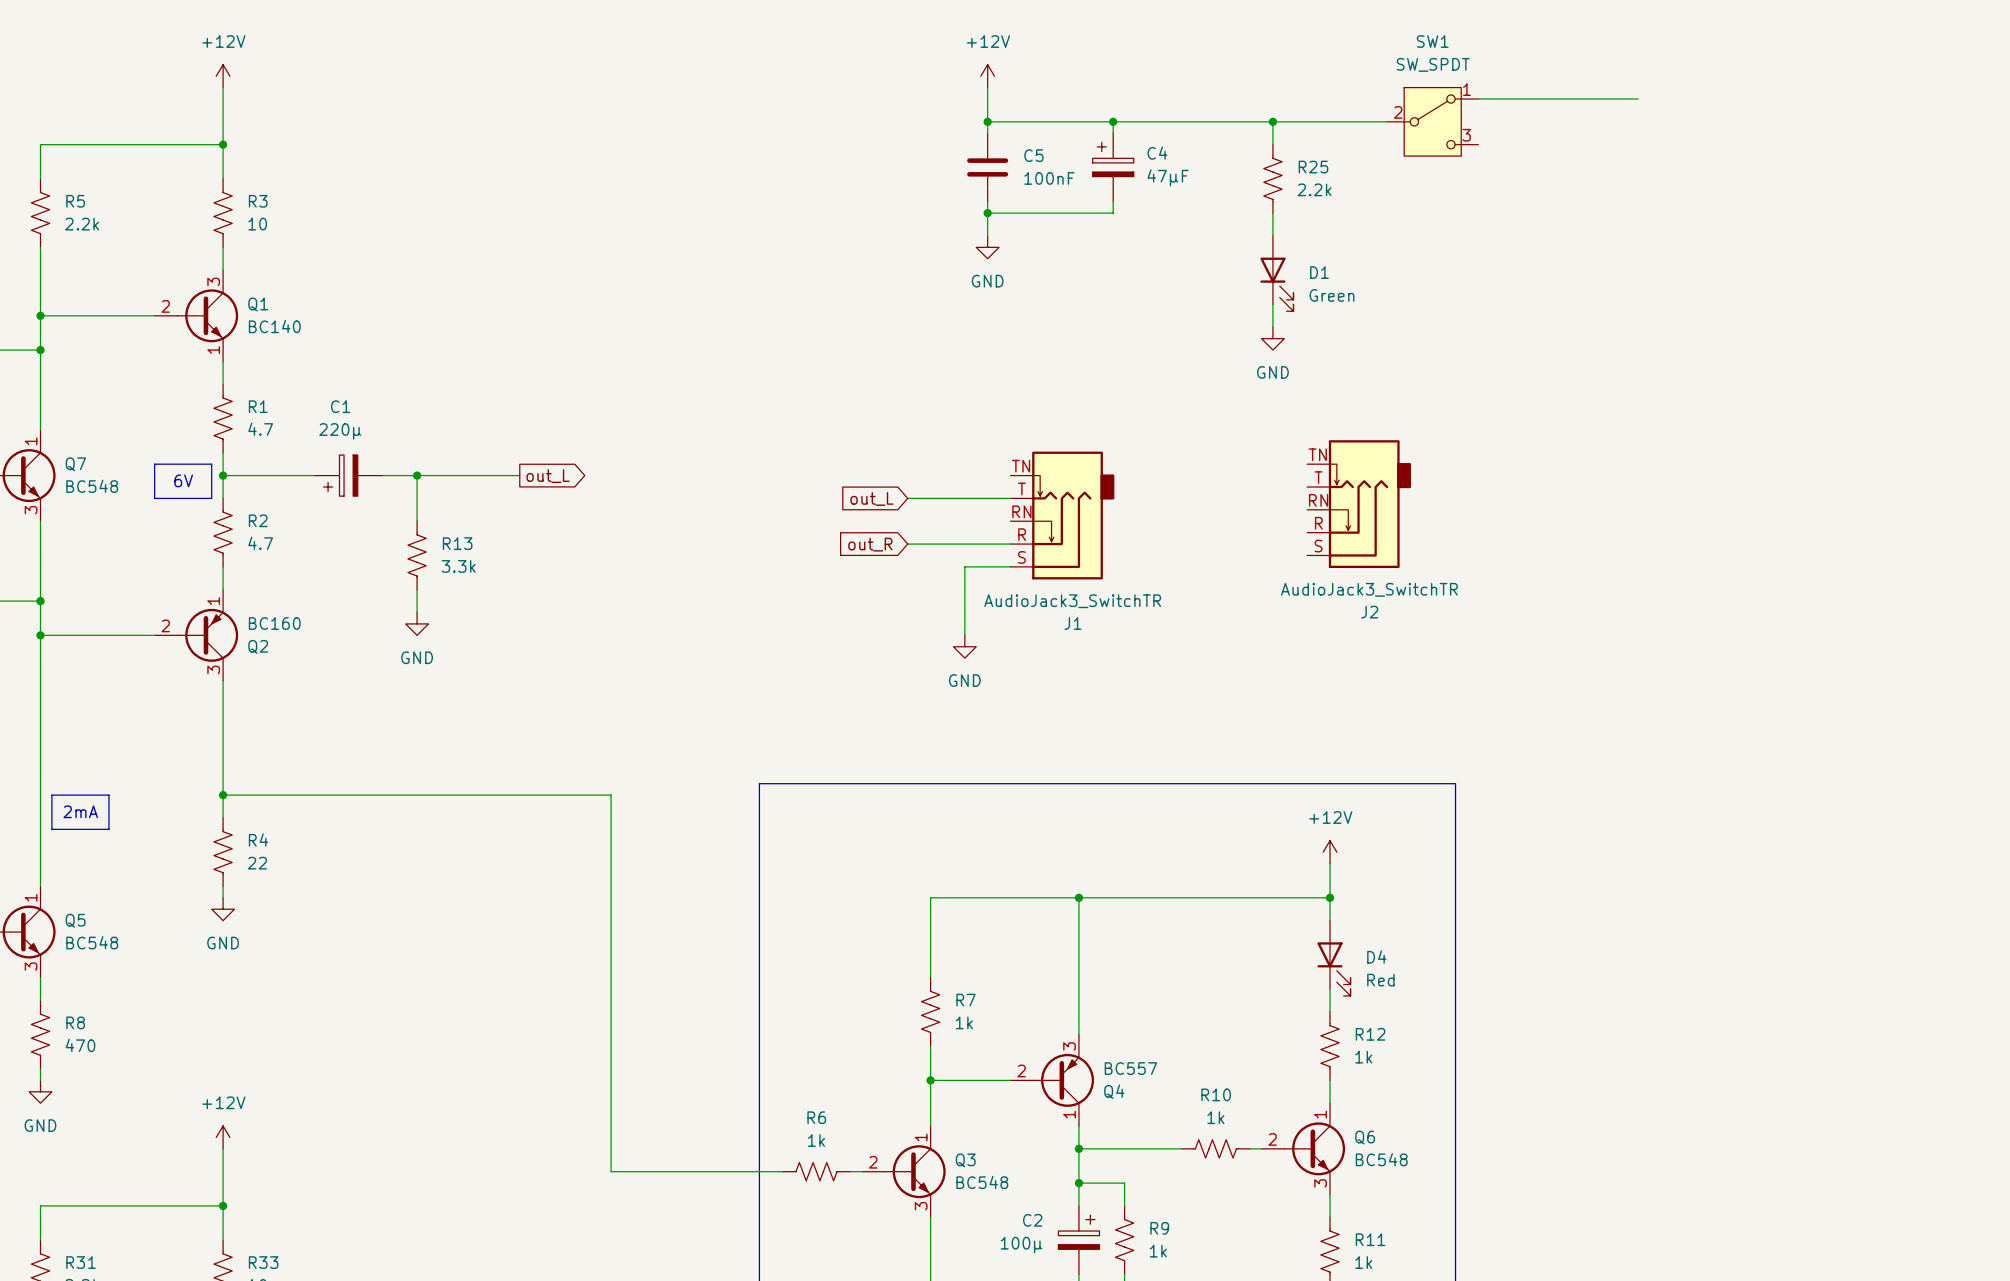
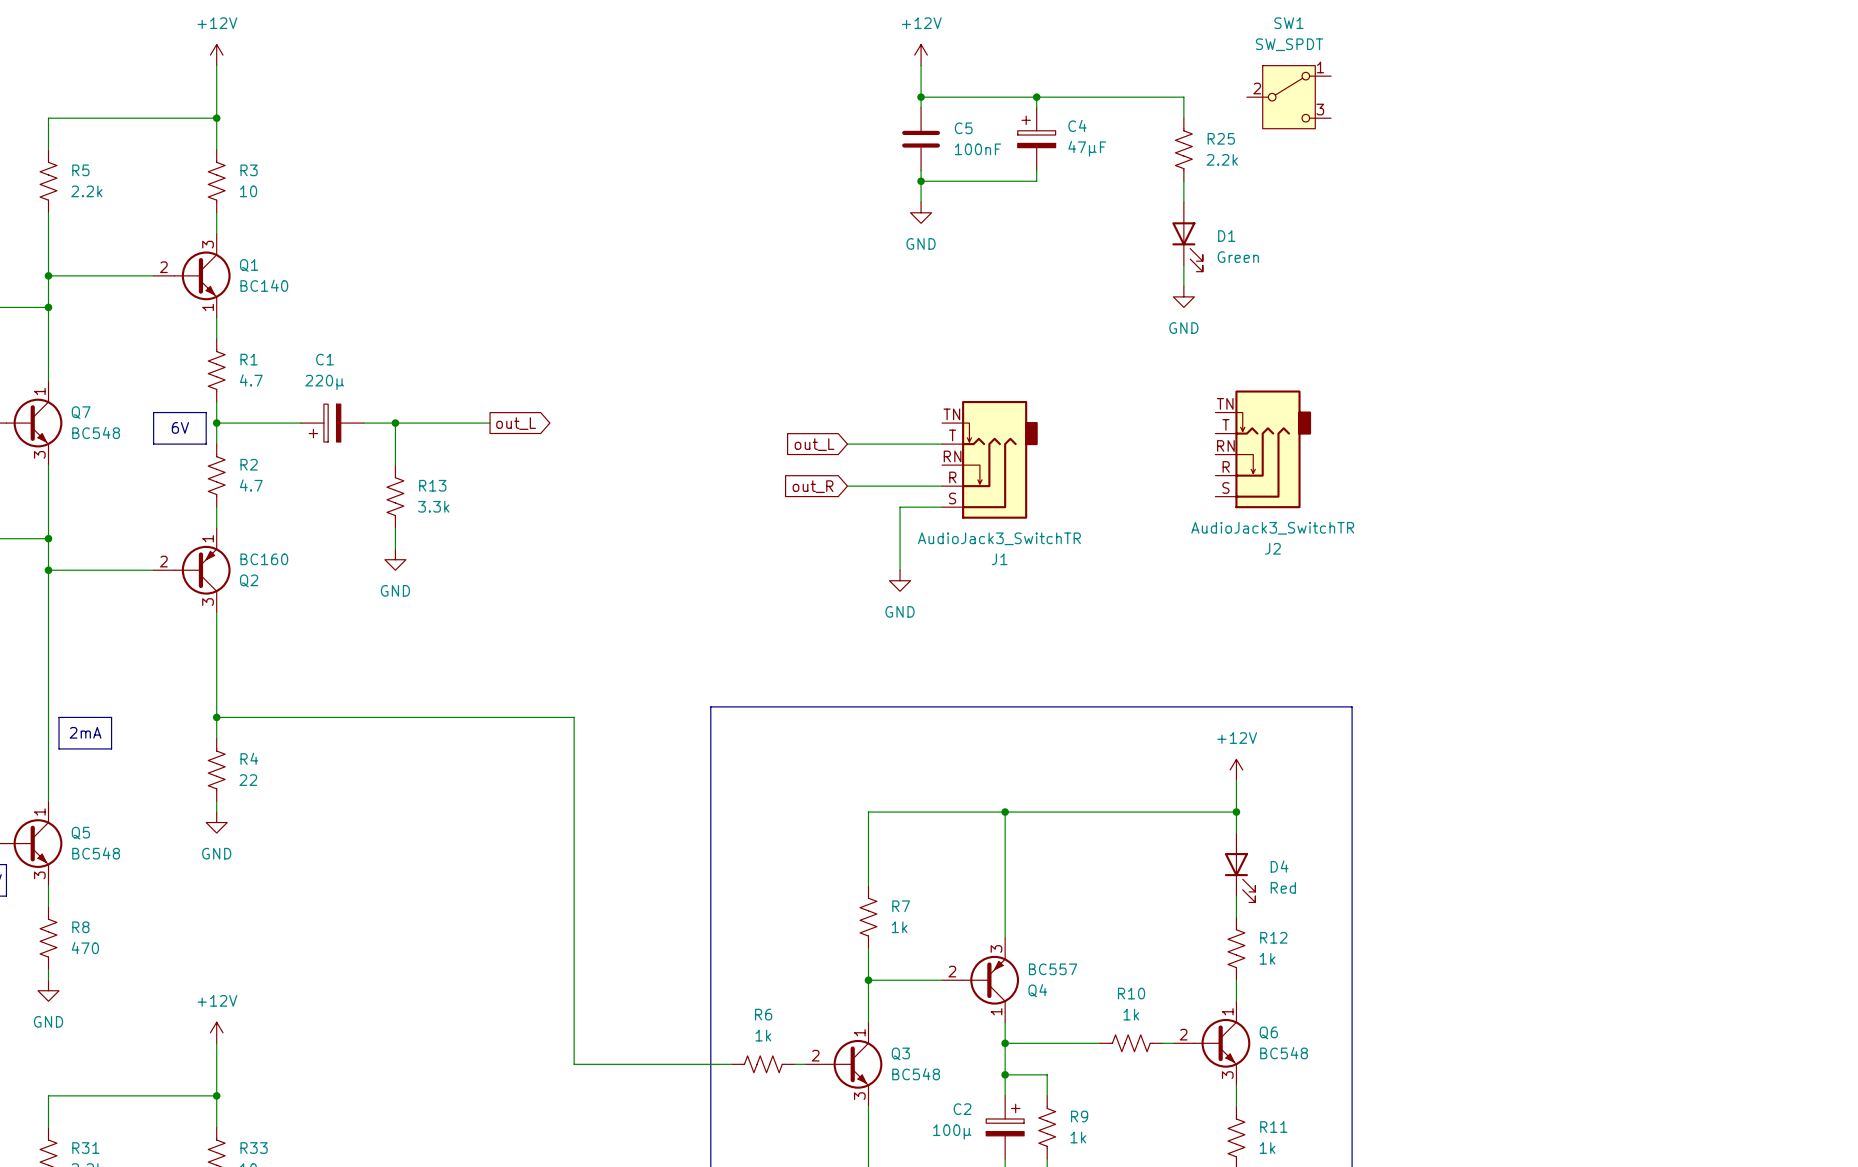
wire: (1478, 99) (1638, 99) -> none
wire: (1272, 121) (1387, 121) -> none
junction: (1272, 121) -> none
SW1 position: (1432, 121) -> (1289, 97)

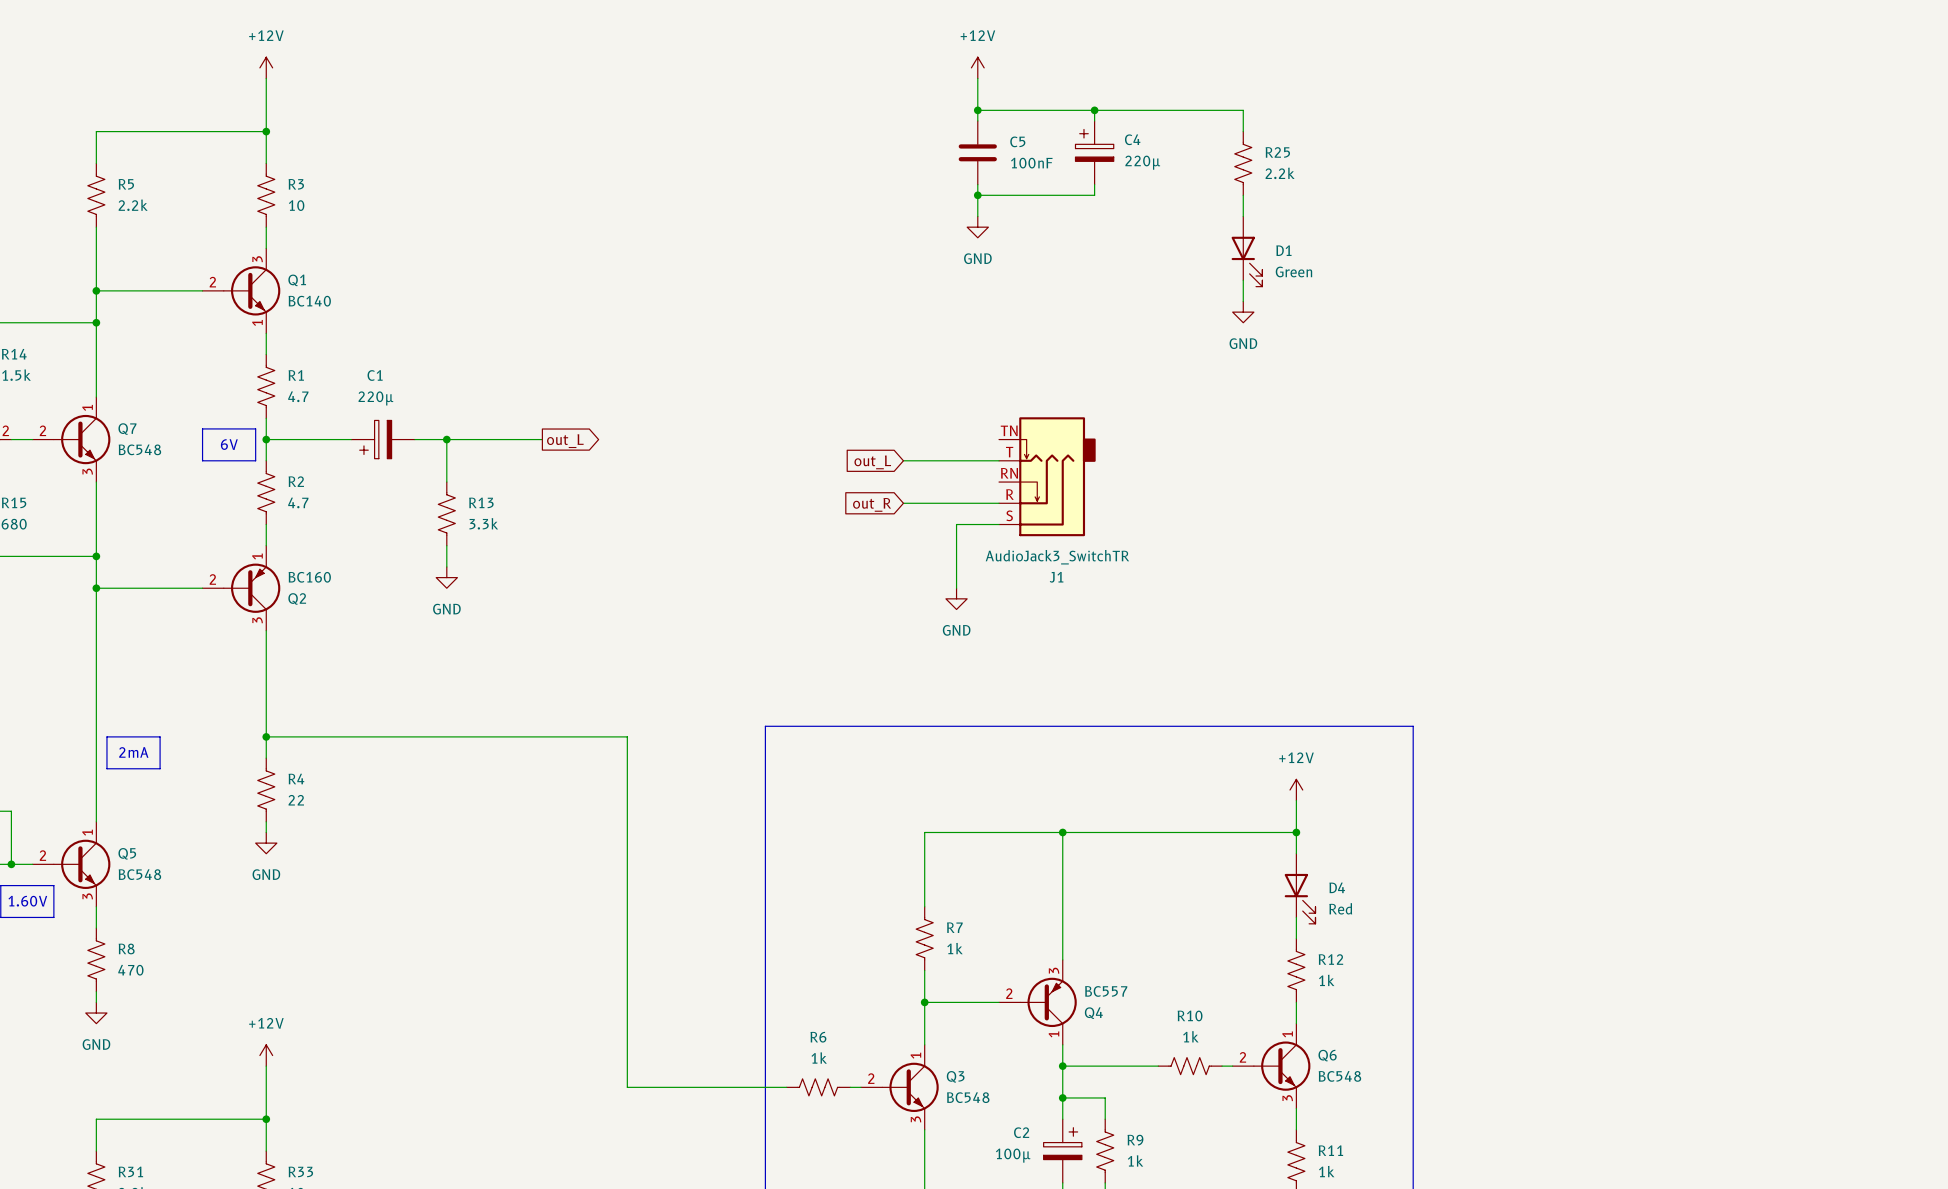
SW1: SW_SPDT (1289, 97) -> none
C4 value: 47µF (1087, 148) -> 220µ (1142, 162)
J2: AudioJack3_SwitchTR (1263, 449) -> none

